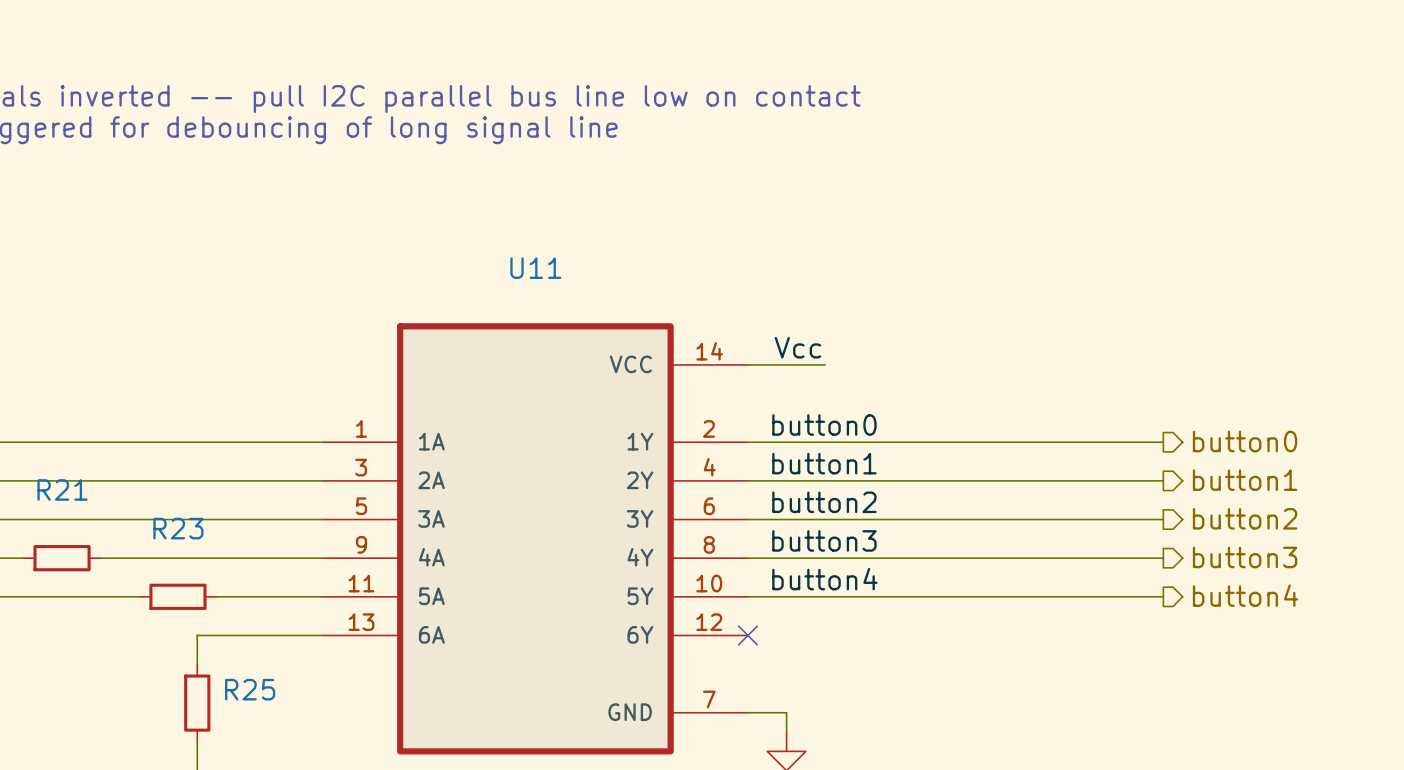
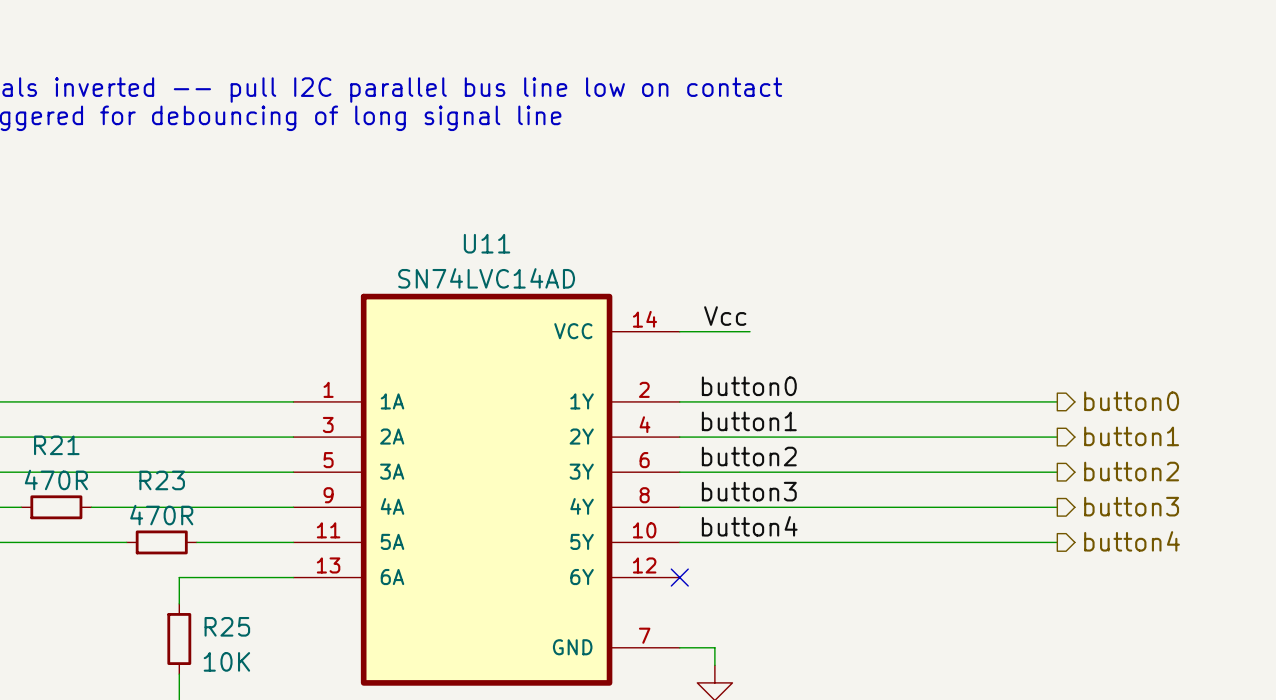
U11 value: none -> SN74LVC14AD (486, 278)
R21 value: none -> 470R (56, 479)
R23 value: none -> 470R (161, 515)
R25 value: none -> 10K (226, 661)

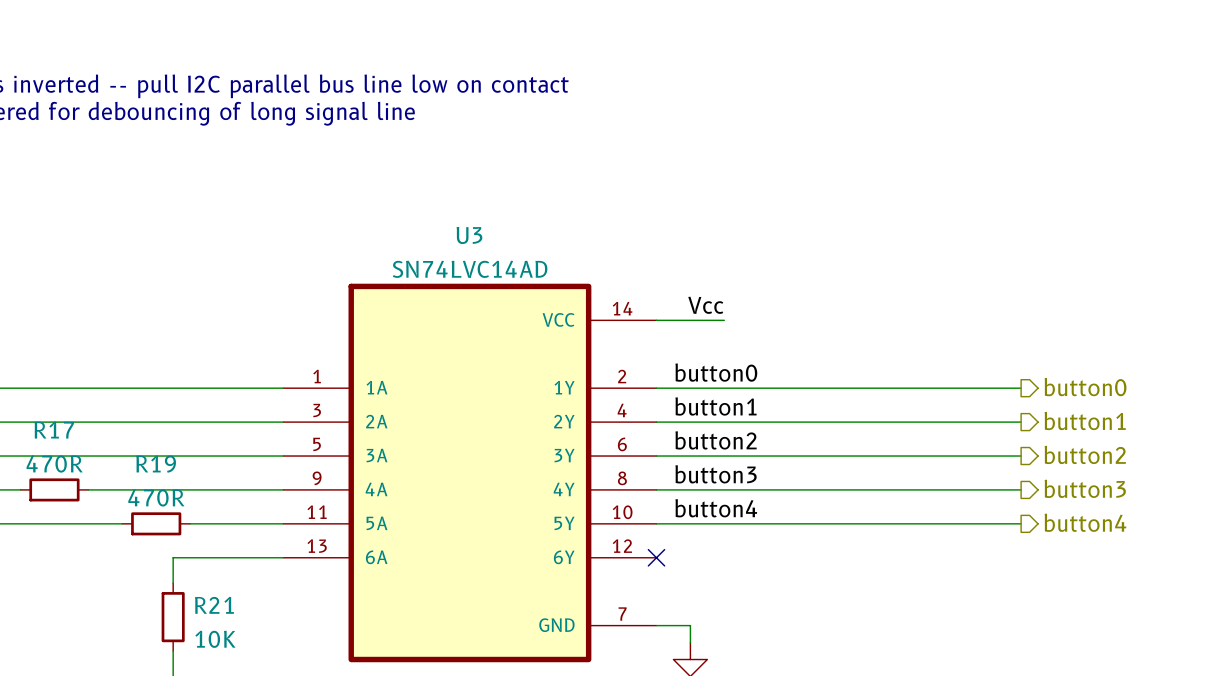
U11 name: U11 (487, 243) -> U3 (469, 235)
R21 name: R21 (56, 445) -> R17 (54, 430)
R23 name: R23 (162, 480) -> R19 (156, 464)
R25 name: R25 (227, 626) -> R21 (214, 605)

